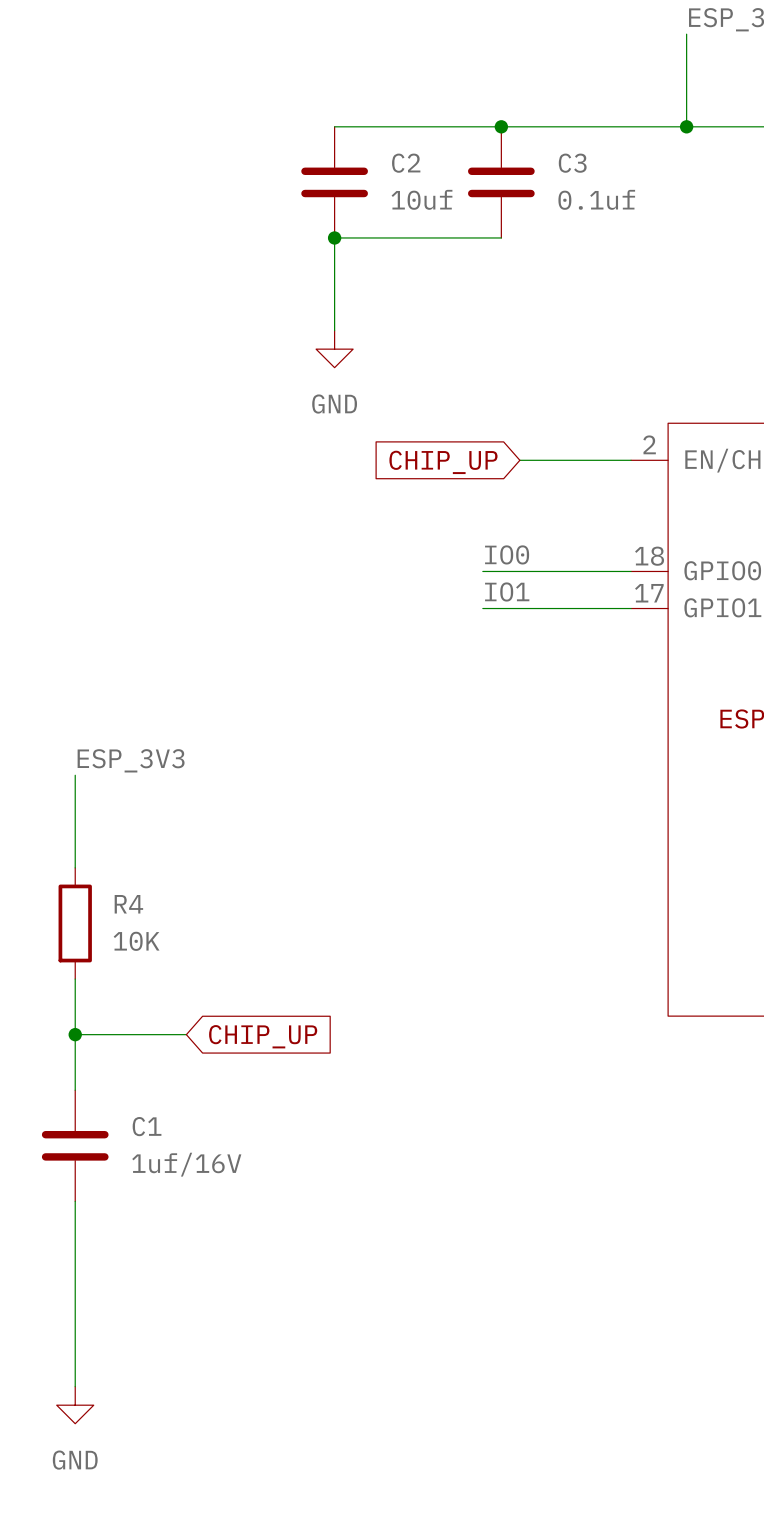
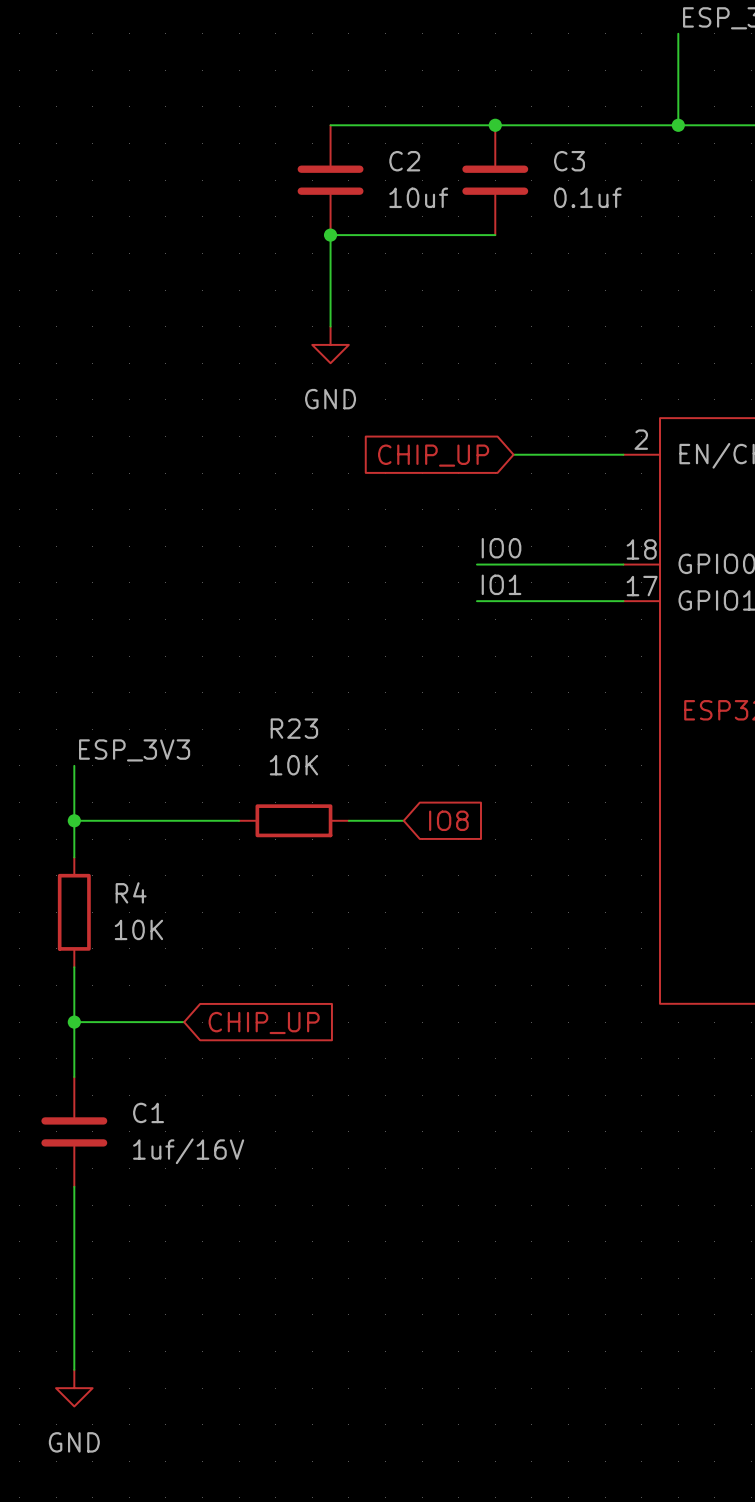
wire: none -> (74, 820) (239, 820)
junction: none -> (74, 820)
R23: none -> 10K (293, 820)
wire: none -> (348, 820) (403, 820)
global label: none -> IO8 (448, 820)

